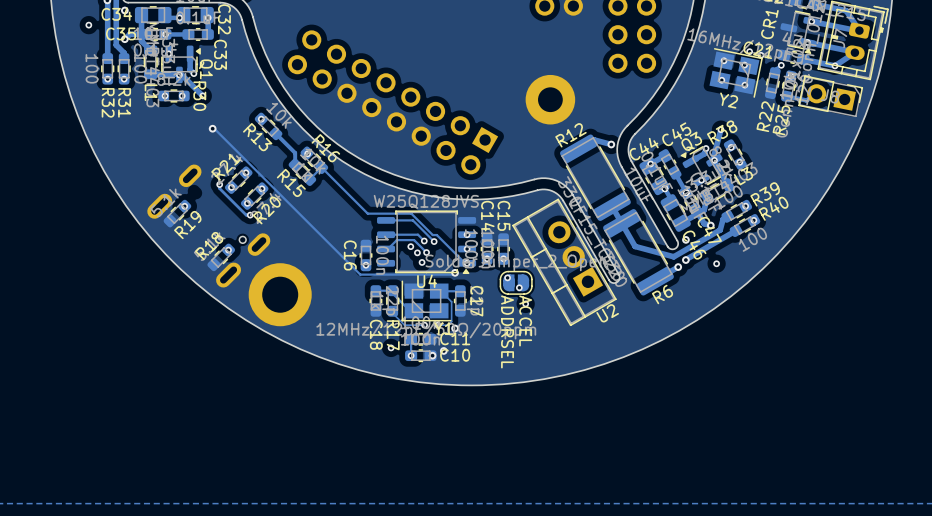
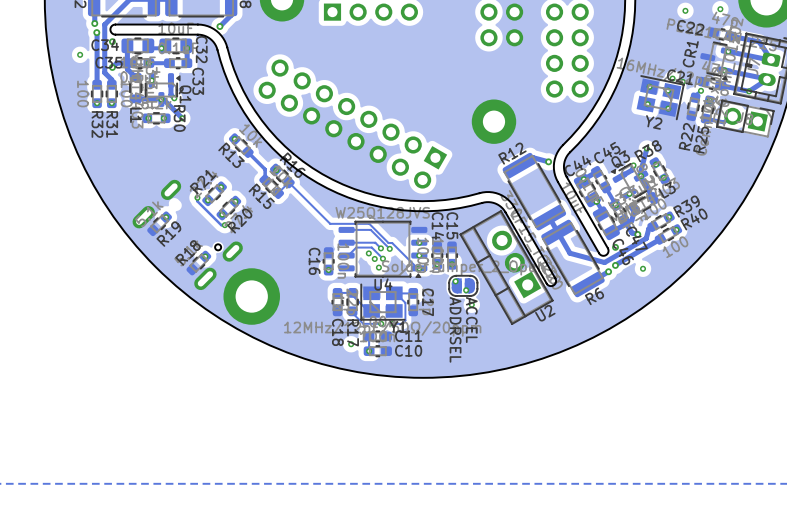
track: (212, 128) (360, 274) (453, 274) (455, 272) -> none
via: (212, 128) -> none
via: (455, 272) -> none
via: (455, 328) -> none
via: (443, 350) -> none
via: (432, 355) -> none

